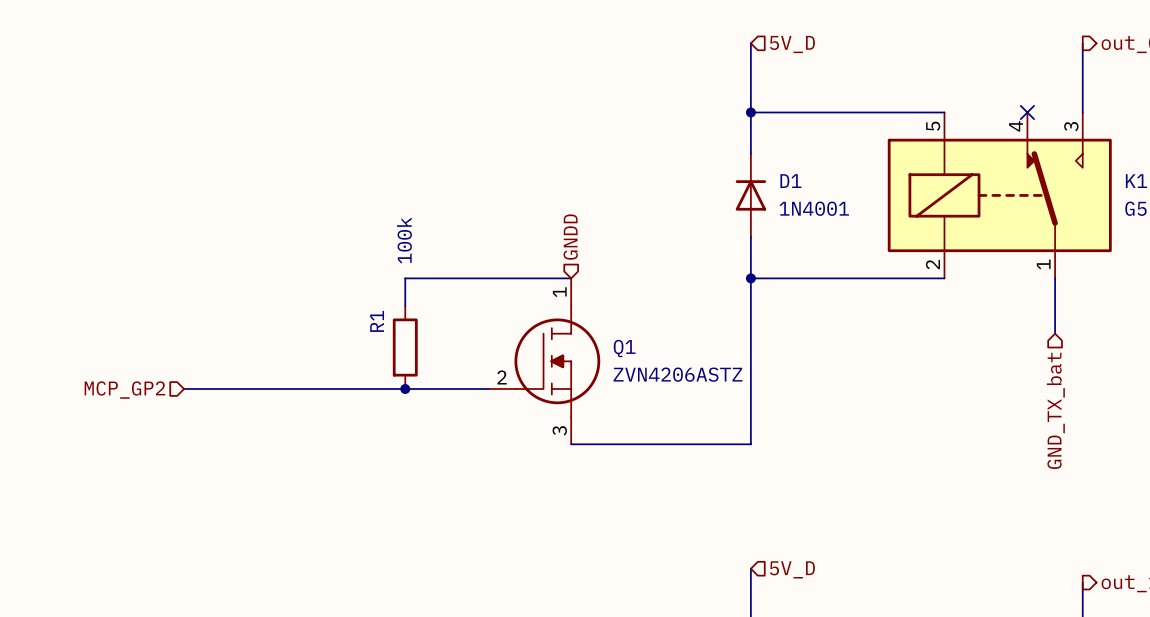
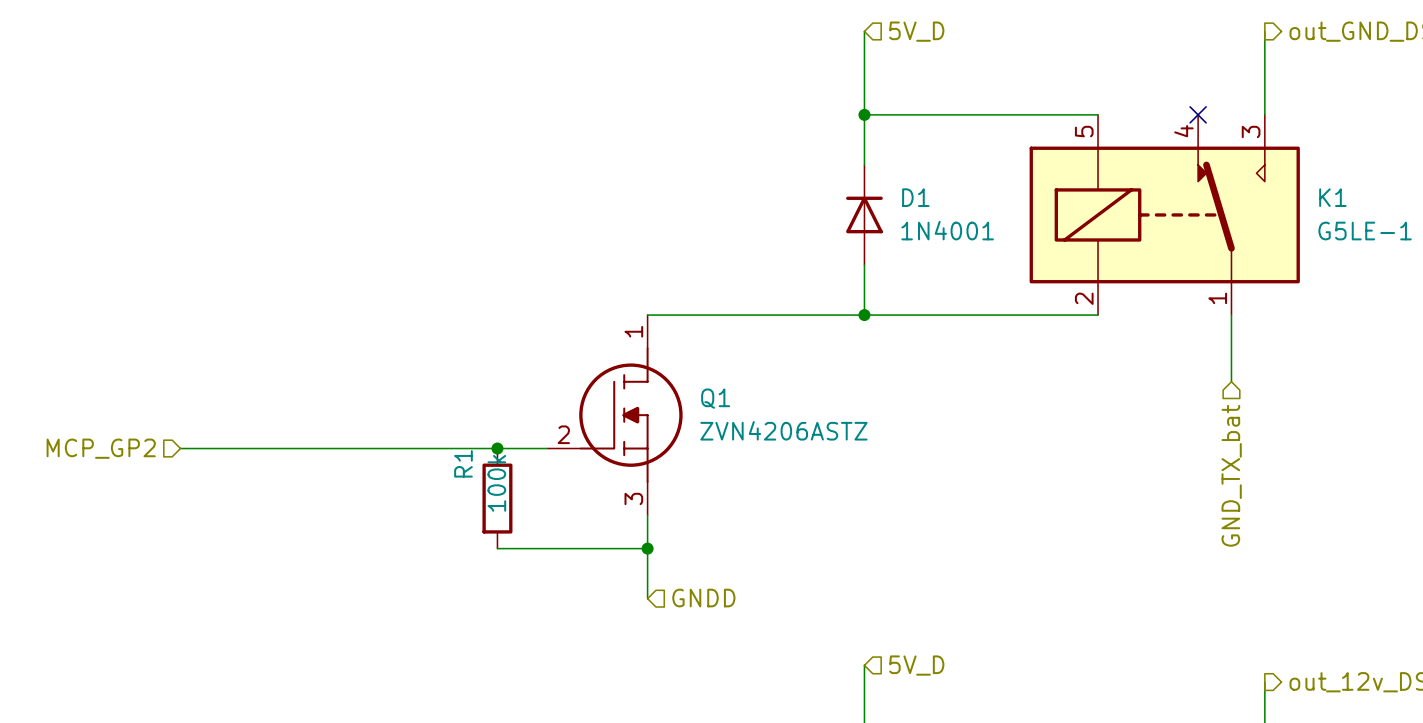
hierarchical label rotation: 0° (570, 237) -> 90° clockwise (703, 598)
hierarchical label position: GNDD (570, 237) -> GNDD (703, 598)
R1 value position: 100k (404, 240) -> 100k (496, 483)
wire: (571, 278) (405, 278) (405, 306) -> none
wire: (750, 278) (750, 444) (571, 444) -> (864, 315) (647, 315)
R1 position: (405, 347) -> (497, 498)
junction position: (405, 388) -> (497, 448)
wire: none -> (647, 515) (647, 598)
wire: none -> (497, 548) (647, 548)
junction: none -> (647, 548)

